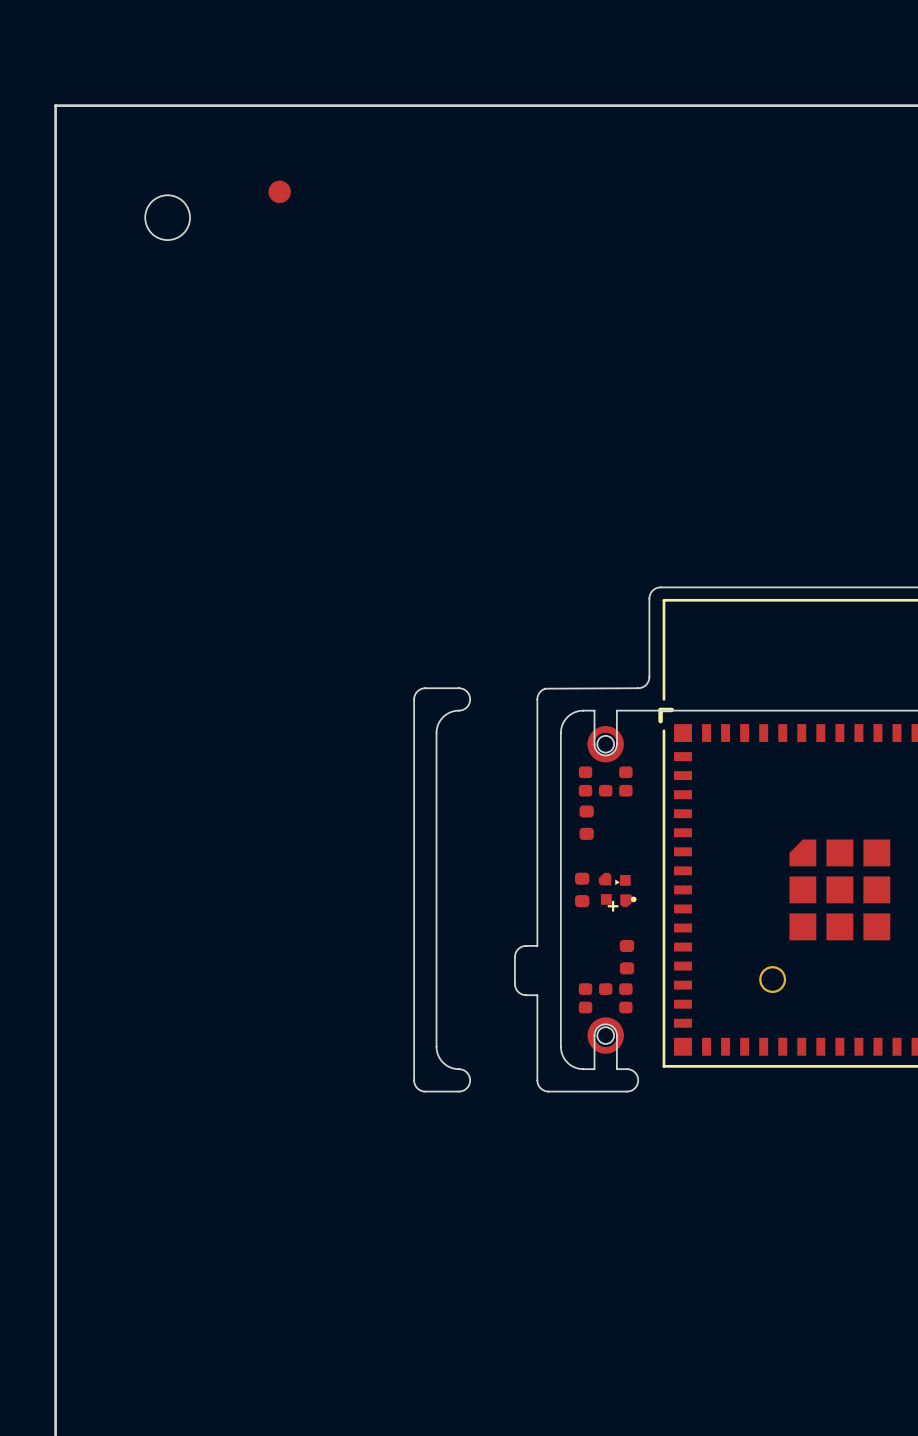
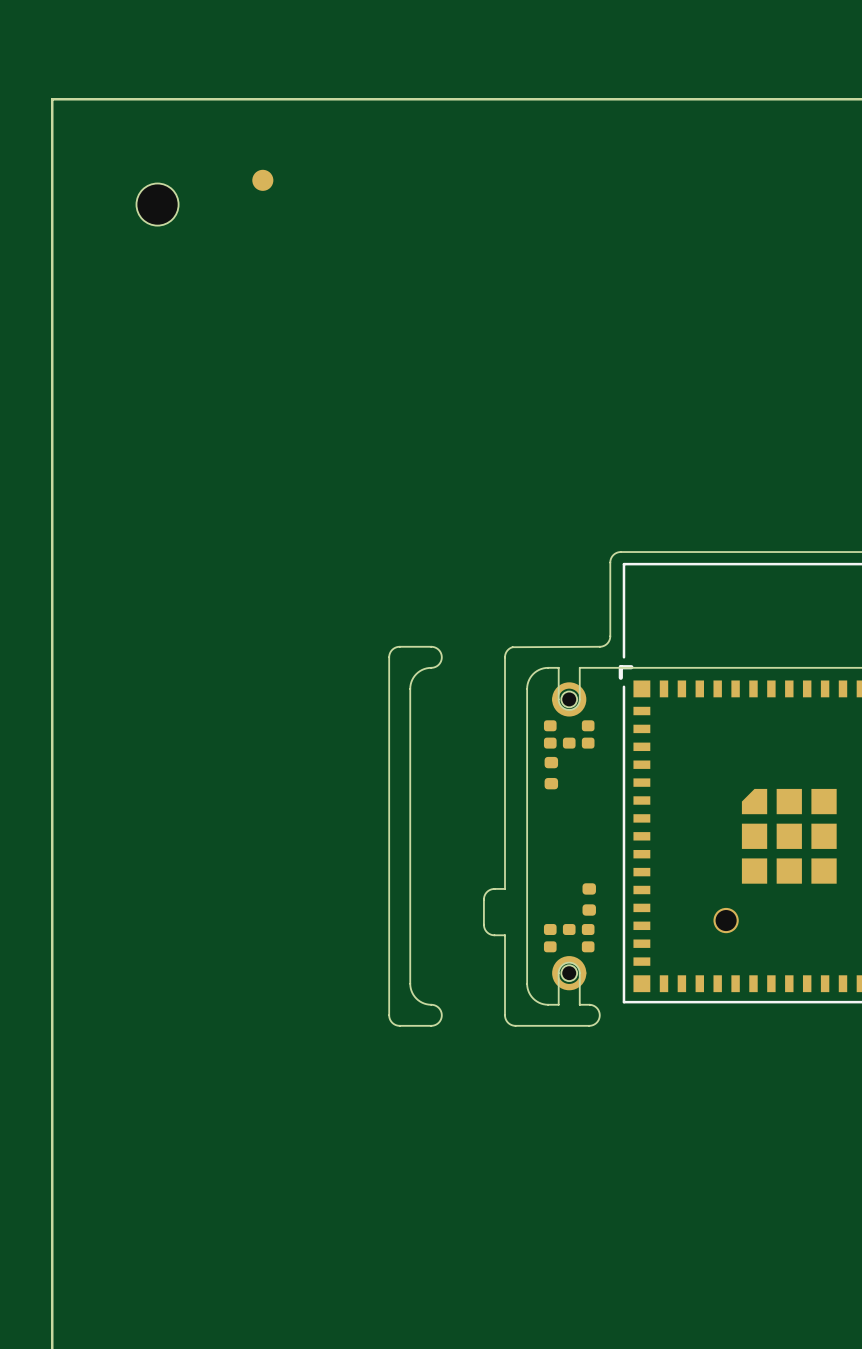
part: (582, 889) -> none
part: (617, 892) -> none

